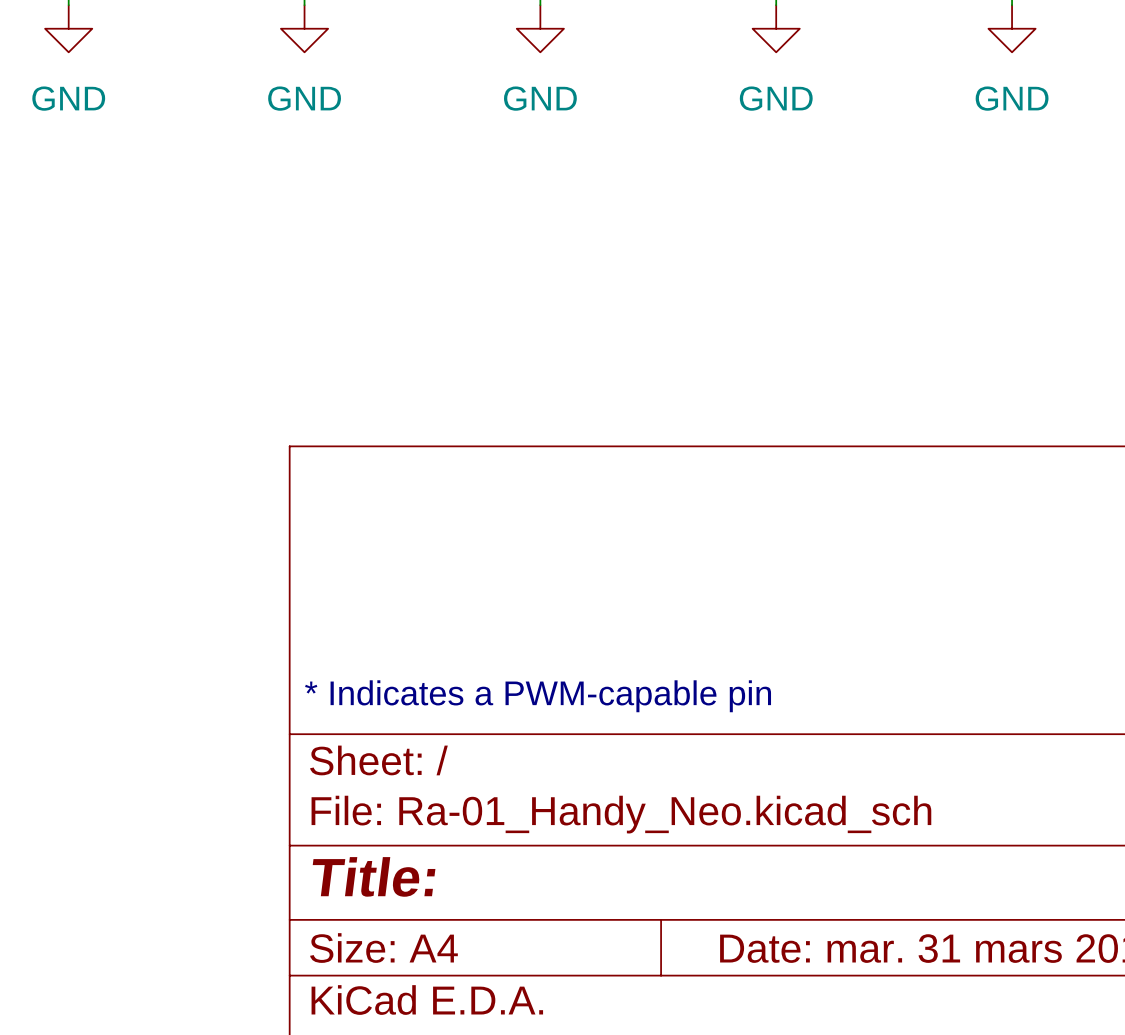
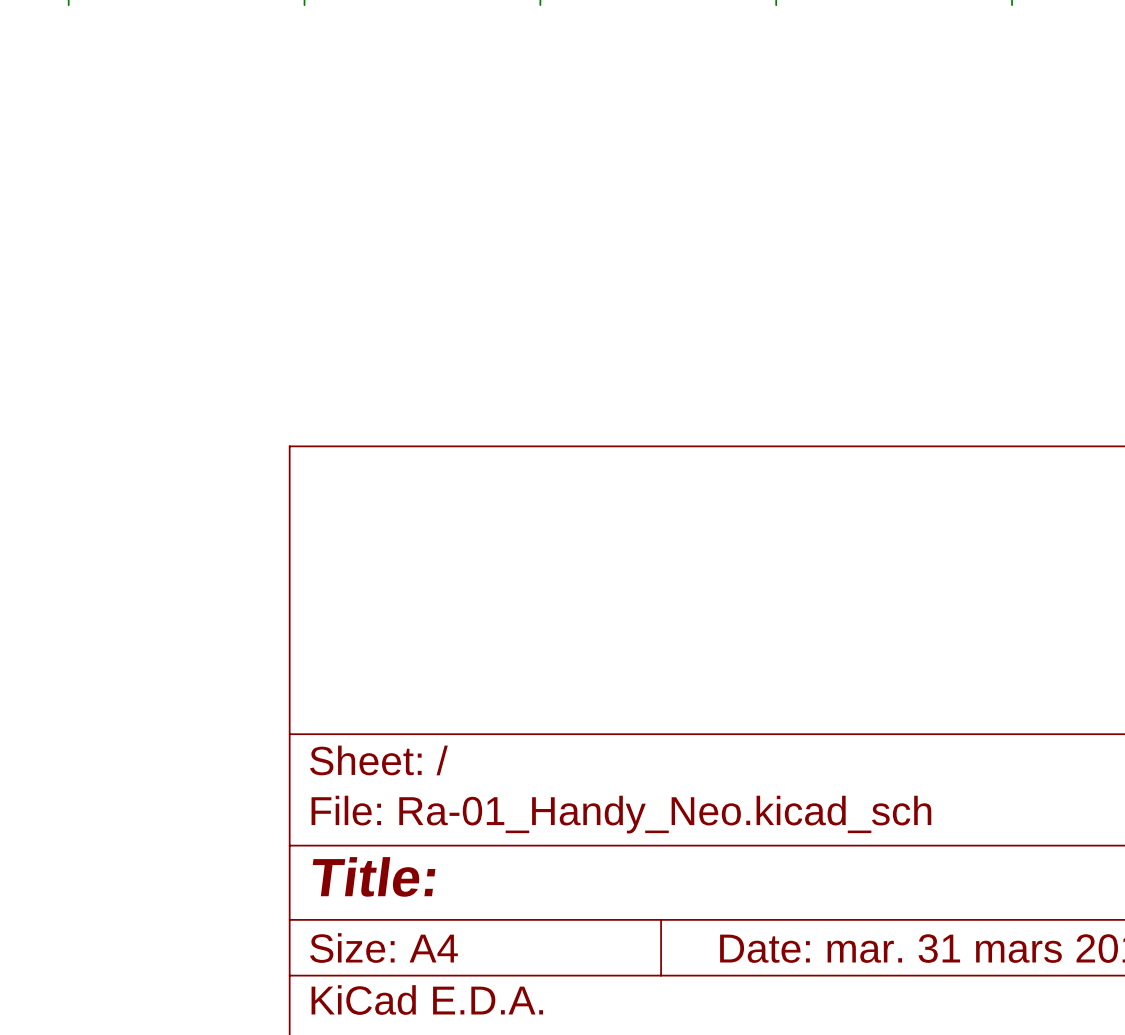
power symbol: GND (68, 28) -> none
power symbol: GND (304, 28) -> none
power symbol: GND (540, 28) -> none
power symbol: GND (776, 28) -> none
power symbol: GND (1012, 28) -> none
text: * Indicates a PWM-capable pin (538, 696) -> none

